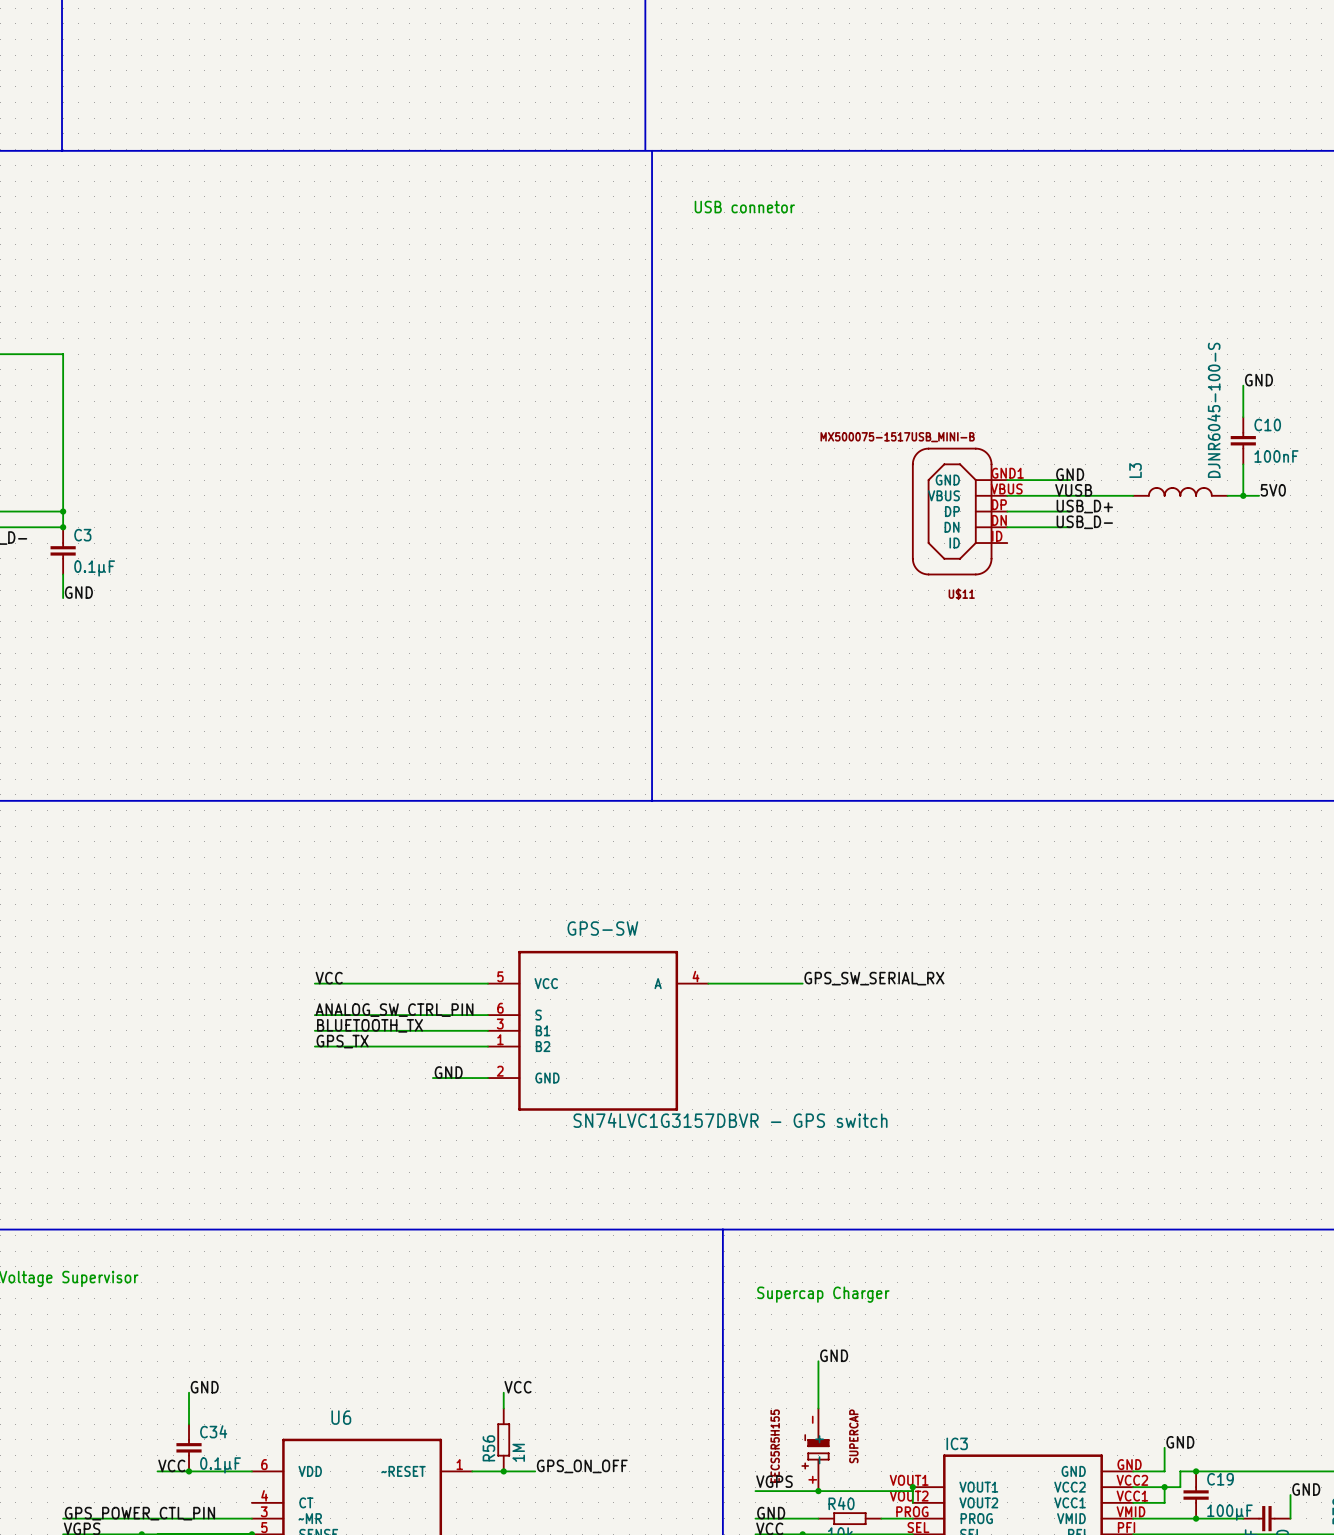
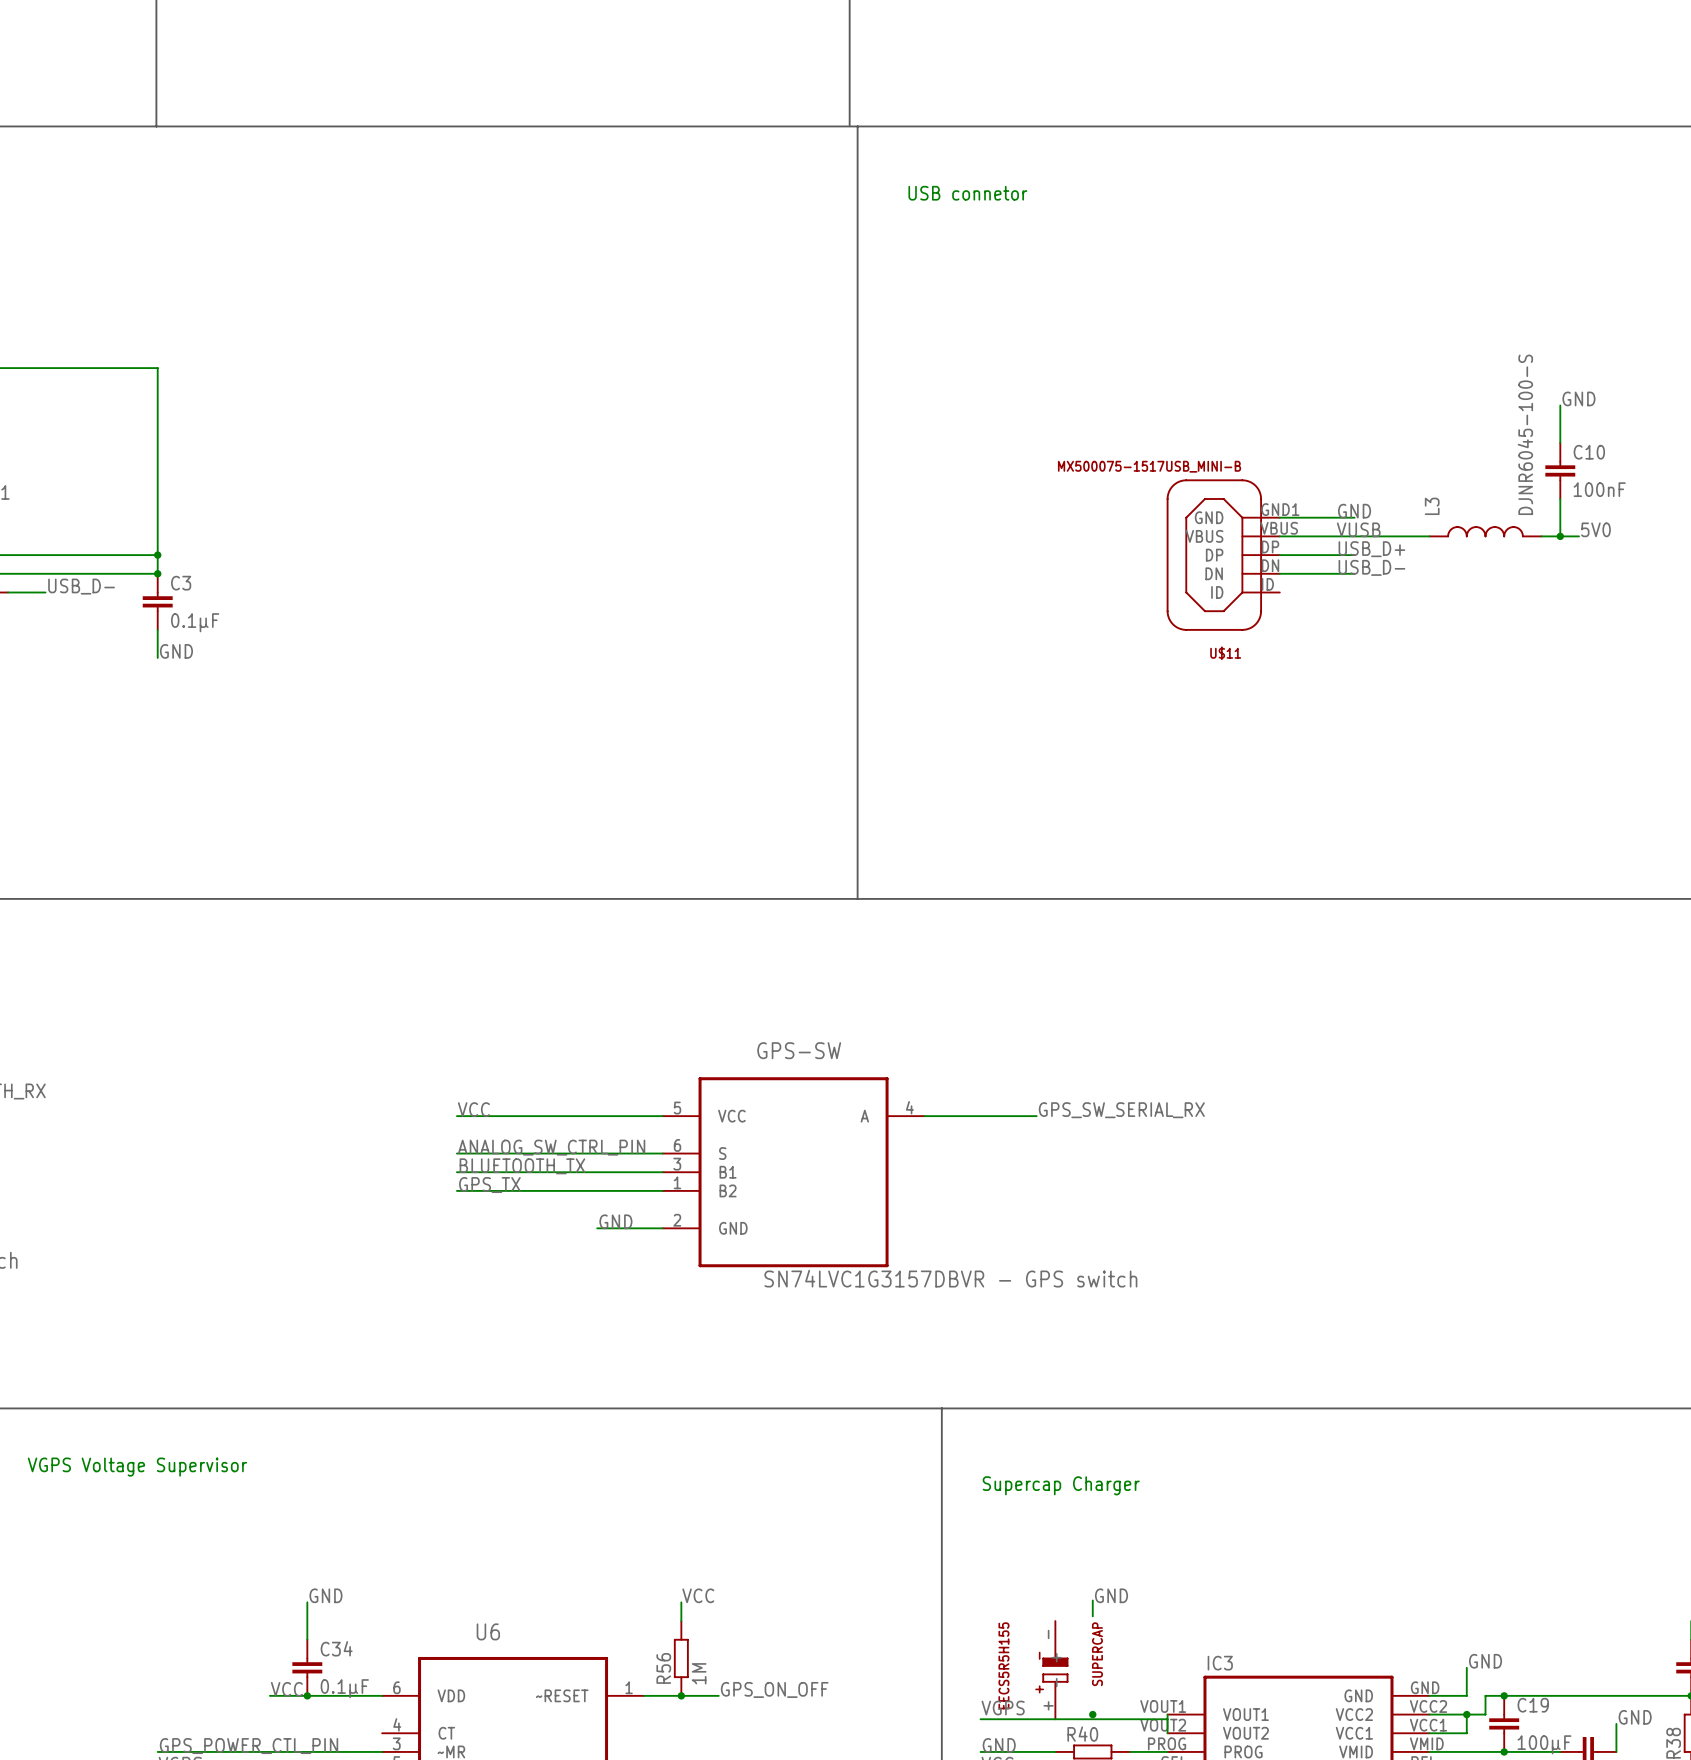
label position: GND (834, 1355) -> GND (1111, 1595)
wire: (818, 1361) (818, 1408) -> none
wire: none -> (1092, 1600) (1092, 1616)
junction: none -> (1092, 1714)
junction: (912, 1487) -> none
junction: (818, 1491) -> none

